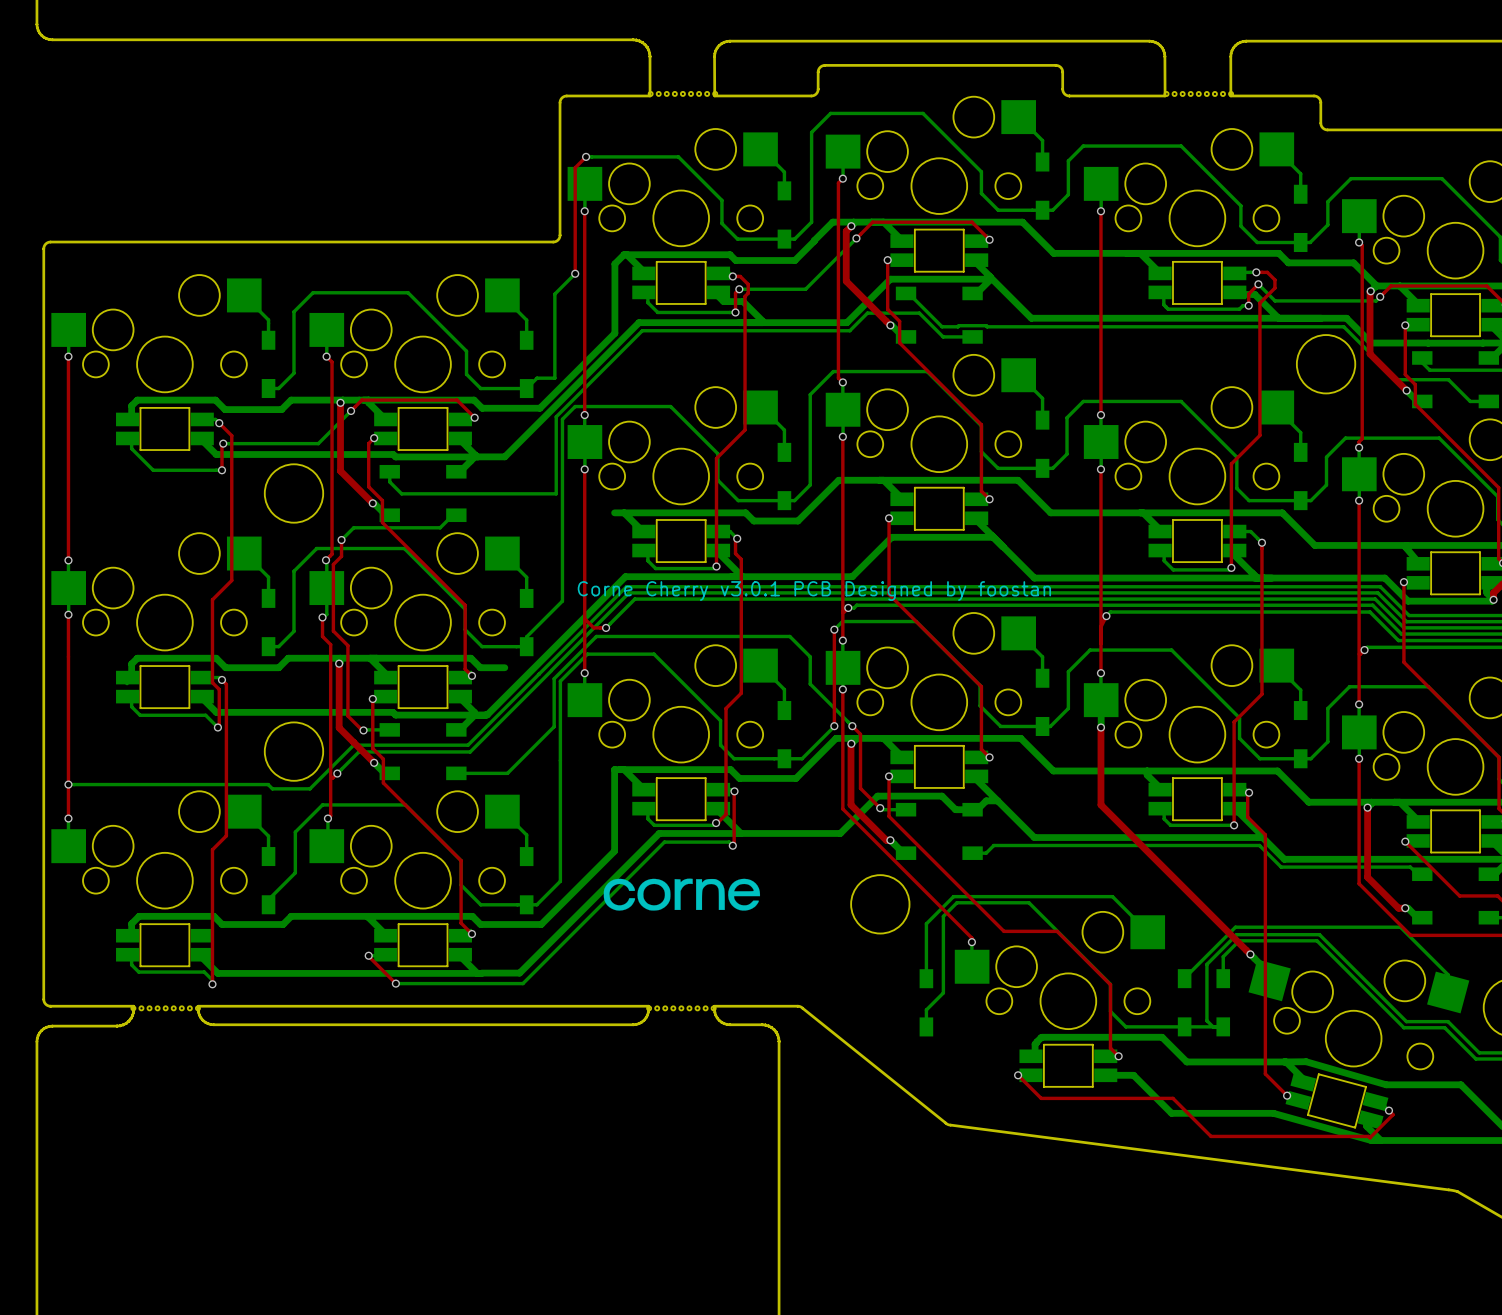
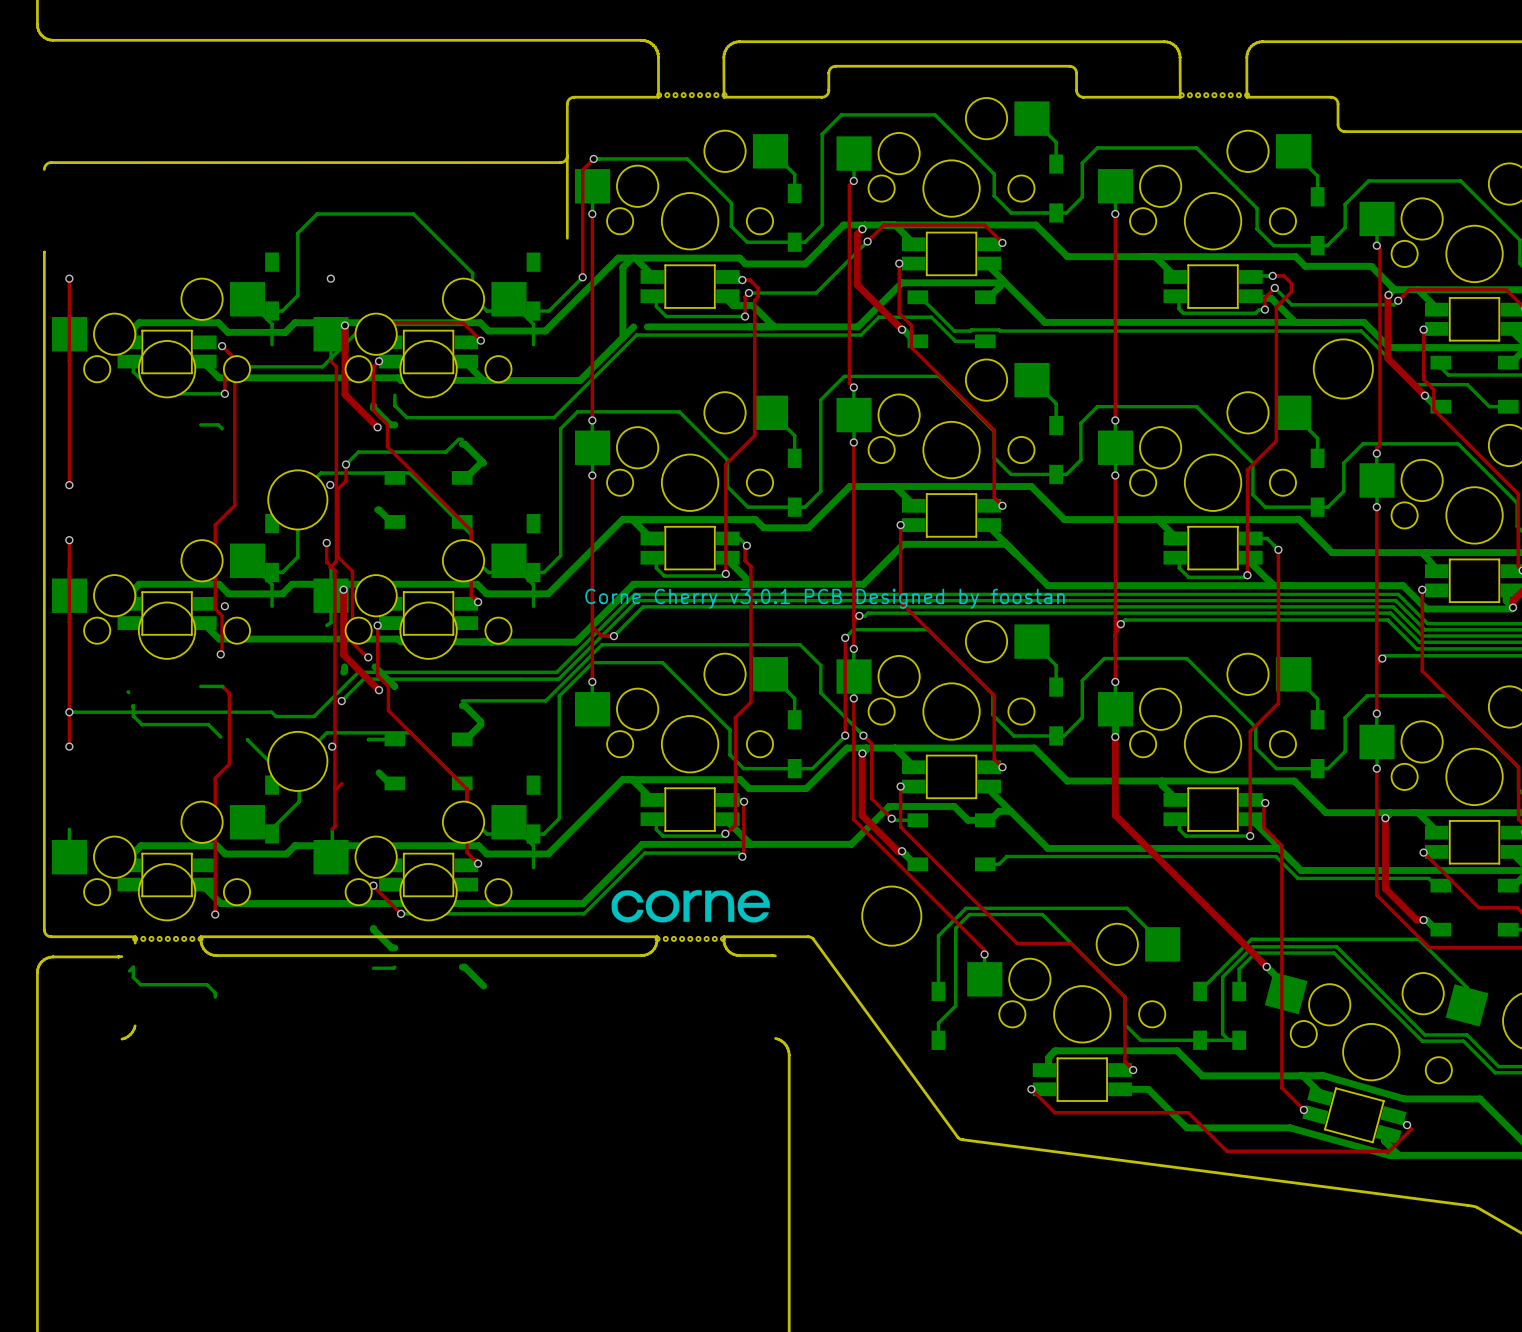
board edge: (560, 235) (558, 240) (553, 242) (50, 242) (45, 244) (43, 248) -> (567, 155) (565, 160) (560, 162) (51, 162) (46, 164) (44, 169)
bottom track: none -> (632, 258) (618, 258) (545, 330) (488, 330) (480, 322) (294, 322) (285, 332) (227, 332) (218, 322) (139, 322) (133, 328) (133, 342)
top track: none -> (69, 278) (69, 361)
via: none -> (69, 278)
via: none -> (330, 278)
bottom track: (554, 294) (554, 378) (537, 378) (526, 388) (480, 388) (466, 374) (466, 351) (408, 292) (313, 292) (293, 311) (293, 373) (278, 388) (268, 388) -> (562, 297) (548, 311) (487, 311) (472, 296) (472, 273) (413, 214) (317, 214) (297, 233) (297, 295) (282, 310) (272, 310)
via: none -> (344, 325)
bottom track: (639, 322) (504, 456) (477, 456) -> none
bottom track: (642, 330) (556, 416) (556, 493) (401, 493) (389, 481) (389, 471) -> (650, 335) (636, 335) (553, 417) (406, 417) (394, 405) (394, 395)
via: none -> (480, 340)
via: none -> (222, 346)
via: (68, 356) -> none
via: (326, 356) -> none
via: none -> (379, 361)
part position: (268, 364) -> (272, 286)
part position: (526, 364) -> (533, 286)
bottom track: (572, 375) (539, 408) (482, 408) (474, 400) (291, 400) (281, 409) (225, 409) (215, 400) (137, 400) (131, 405) (131, 419) -> (579, 380) (483, 380) (464, 361) (462, 361)
via: none -> (224, 393)
top track: (340, 402) (340, 471) (372, 503) -> (344, 325) (344, 394) (377, 427)
via: (340, 402) -> none
bottom track: (575, 406) (562, 419) (562, 601) (526, 636) (526, 646) (482, 646) (465, 629) (465, 609) (404, 548) (316, 548) (293, 571) (293, 631) (278, 646) (268, 646) -> (582, 411) (577, 411) (560, 428) (560, 555) (543, 572) (488, 572) (471, 555) (471, 534) (409, 473) (320, 473) (297, 496) (297, 557) (282, 572) (272, 572)
bottom track: (351, 410) (318, 443) (223, 443) -> (355, 333) (322, 366) (226, 366)
top track: (351, 410) (361, 400) (457, 400) (474, 417) -> (355, 333) (366, 322) (462, 322) (480, 340)
via: (351, 410) -> none
via: (474, 417) -> none
via: none -> (377, 427)
top track: (219, 423) (231, 435) -> (222, 346) (234, 358) (234, 441)
via: (219, 423) -> none
part position: (164, 428) -> (167, 351)
part position: (423, 428) -> (428, 351)
bottom track: (131, 438) (131, 448) (153, 470) (221, 470) -> (133, 361) (133, 371) (155, 393) (224, 393)
bottom track: (198, 438) (216, 454) (393, 454) (395, 456) (474, 456) -> (200, 361) (219, 377) (398, 377) (400, 380) (481, 380)
top track: (374, 438) (368, 443) (368, 486) (382, 500) (382, 522) (465, 605) (465, 669) (471, 675) -> (379, 361) (373, 366) (373, 410) (387, 424) (387, 446) (471, 530) (471, 595) (478, 602)
via: (374, 438) -> none
top track: (223, 443) (221, 470) -> (226, 366) (224, 393)
via: (223, 443) -> none
via: none -> (345, 464)
via: (221, 470) -> none
top track: (68, 478) (68, 533) -> (69, 567) (69, 622)
via: none -> (69, 485)
via: none -> (330, 484)
top track: (231, 498) (231, 580) (212, 599) -> (234, 505) (215, 525) (215, 607)
via: (372, 503) -> none
bottom track: none -> (622, 519) (548, 593) (486, 593) (477, 584) (292, 584) (282, 593) (228, 593) (219, 584) (139, 584) (133, 590) (133, 603)
bottom track: (456, 515) (452, 515) (440, 527) (353, 527) (341, 540) -> (462, 439) (458, 439) (445, 452) (358, 452) (345, 464)
via: none -> (326, 542)
top track: (341, 540) (341, 556) (333, 564) (333, 631) (347, 645) (347, 716) (363, 730) -> (345, 464) (345, 481) (337, 489) (337, 556) (352, 571) (352, 642) (368, 657)
via: (341, 540) -> none
via position: (68, 560) -> (69, 540)
via: (326, 560) -> none
via: none -> (343, 589)
via: none -> (478, 602)
via: none -> (224, 606)
top track: (212, 601) (212, 682) (219, 689) (217, 727) -> (215, 608) (222, 615) (220, 654)
via: (68, 614) -> none
bottom track: none -> (200, 623) (203, 623) (219, 639) (398, 639) (400, 641) (491, 642)
top track: (322, 617) (322, 636) (330, 644) -> (326, 542) (326, 562) (334, 570) (334, 653)
via: (322, 617) -> none
via: none -> (377, 625)
part position: (268, 622) -> (272, 548)
part position: (526, 622) -> (533, 548)
bottom track: (568, 633) (485, 714) -> (575, 642) (480, 642)
bottom track: (596, 636) (554, 678) (554, 726) (507, 773) (456, 773) -> (604, 644) (601, 644) (545, 700) (462, 700)
via: none -> (368, 657)
bottom track: (587, 654) (560, 681) (560, 881) (536, 904) (480, 904) (461, 885) (461, 860) (405, 804) (322, 804) (295, 832) (295, 872) (268, 899) (268, 904) -> (595, 662) (592, 662) (559, 696) (559, 818) (543, 834) (487, 834) (467, 814) (467, 789) (410, 732) (326, 732) (299, 760) (299, 801) (272, 828) (272, 833)
top track: (339, 663) (339, 727) (374, 762) -> (343, 589) (343, 654) (379, 690)
via: (339, 663) -> none
bottom track: (549, 663) (468, 745) (353, 745) (310, 788) (272, 788) (268, 784) (68, 784) -> (556, 672) (358, 672) (314, 716) (276, 716) (271, 712) (69, 712)
bottom track: (504, 667) (480, 667) (470, 658) (288, 658) (278, 667) (225, 667) (216, 658) (137, 658) (131, 663) (131, 677) -> none
bottom track: (551, 670) (470, 751) (358, 751) (337, 773) -> (558, 679) (363, 679) (341, 701)
via: (471, 675) -> none
via position: (221, 679) -> (220, 654)
part position: (164, 687) -> (167, 613)
part position: (423, 687) -> (428, 613)
via: none -> (341, 701)
bottom track: (198, 696) (200, 696) (216, 712) (393, 712) (395, 715) (485, 715) (474, 715) -> none
top track: (372, 698) (372, 748) (383, 759) (383, 782) (461, 860) (461, 923) (471, 934) -> (377, 625) (377, 675) (388, 686) (388, 710) (467, 789) (467, 852) (478, 863)
via position: (372, 698) -> (379, 690)
via: none -> (69, 712)
via: (217, 727) -> none
via: (363, 730) -> none
top track: (68, 737) (68, 818) -> none
via: none -> (69, 746)
via: none -> (332, 746)
top track: (226, 754) (226, 835) (212, 849) -> (229, 764) (215, 778) (215, 860)
via: (374, 762) -> none
bottom track: (614, 769) (614, 851) (541, 924) (480, 924) (472, 916) (291, 916) (283, 924) (222, 924) (214, 916) (139, 916) (131, 923) (131, 935) -> (622, 779) (548, 853) (486, 853) (478, 845) (295, 845) (286, 853) (225, 853) (216, 845) (140, 845) (133, 853) (133, 865)
via: (337, 773) -> none
via: (68, 784) -> none
bottom track: (244, 811) (268, 836) (268, 856) -> (247, 739) (272, 764) (272, 785)
via: (68, 818) -> none
via: (327, 818) -> none
bottom track: (659, 833) (519, 973) (481, 973) -> (667, 844) (642, 844) (583, 903) (220, 903) (200, 884)
bottom track: (664, 842) (522, 983) (395, 983) -> (673, 853) (644, 853) (584, 913) (401, 913)
via: none -> (478, 863)
via: none -> (373, 885)
part position: (268, 880) -> (272, 809)
part position: (526, 880) -> (533, 809)
top track: (212, 902) (212, 984) -> none
via: none -> (215, 914)
via: none -> (401, 913)
board edge: (43, 917) (43, 999) (45, 1004) (50, 1006) -> (44, 929) (46, 934) (51, 936)
via: (471, 934) -> none
part position: (164, 945) -> (167, 874)
part position: (423, 945) -> (428, 874)
bottom track: (198, 954) (217, 973) (481, 973) -> none
top track: (368, 955) (395, 983) -> (373, 885) (401, 913)
via: (368, 955) -> none
via: (395, 983) -> none
via: (212, 984) -> none
board edge: (50, 1006) (133, 1006) (133, 1012) -> (51, 936) (135, 936) (135, 943)
board edge: (198, 1006) (648, 1006) (647, 1015) (644, 1020) (633, 1024) (213, 1024) (202, 1020) (199, 1015) (198, 1006) -> (200, 936) (657, 936) (655, 945) (652, 950) (641, 955) (216, 955) (205, 950) (202, 945) (200, 936)
part position: (165, 1008) -> (167, 938)
part position: (681, 1008) -> (690, 938)
board edge: (120, 1025) (49, 1026) (39, 1033) (36, 1041) -> (121, 956) (53, 956) (41, 961) (37, 972) (37, 1055)
board edge: (765, 1025) (724, 1023) (717, 1017) (714, 1006) (800, 1007) (945, 1123) -> (775, 955) (733, 954) (726, 948) (723, 936) (812, 938) (958, 1137)

